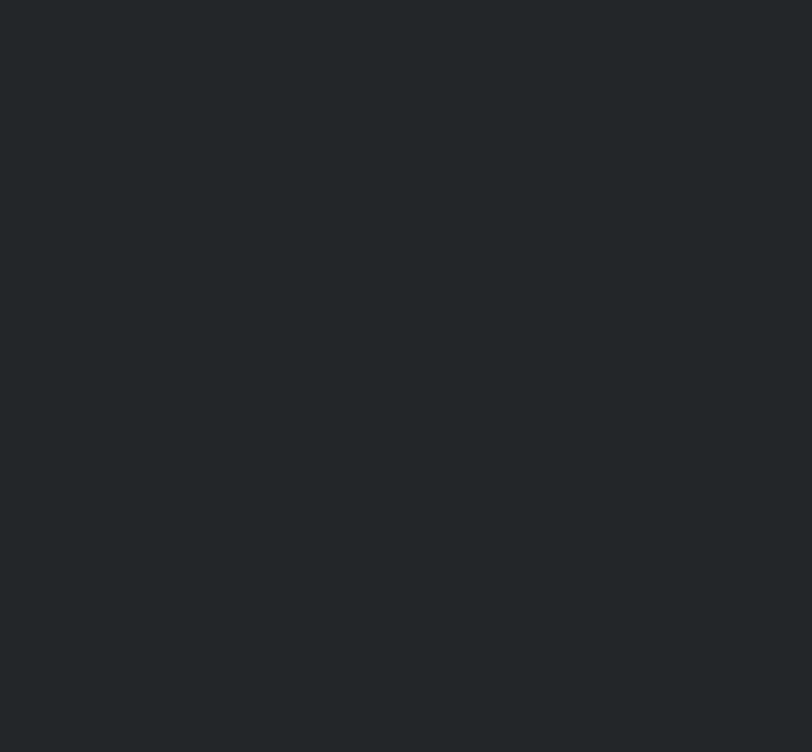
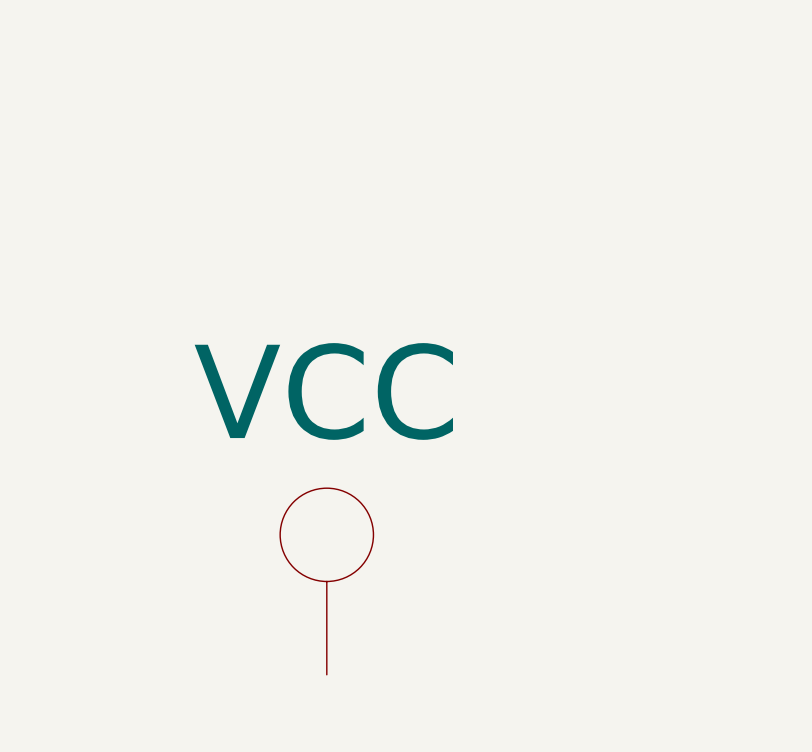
power symbol: none -> VCC (326, 581)

